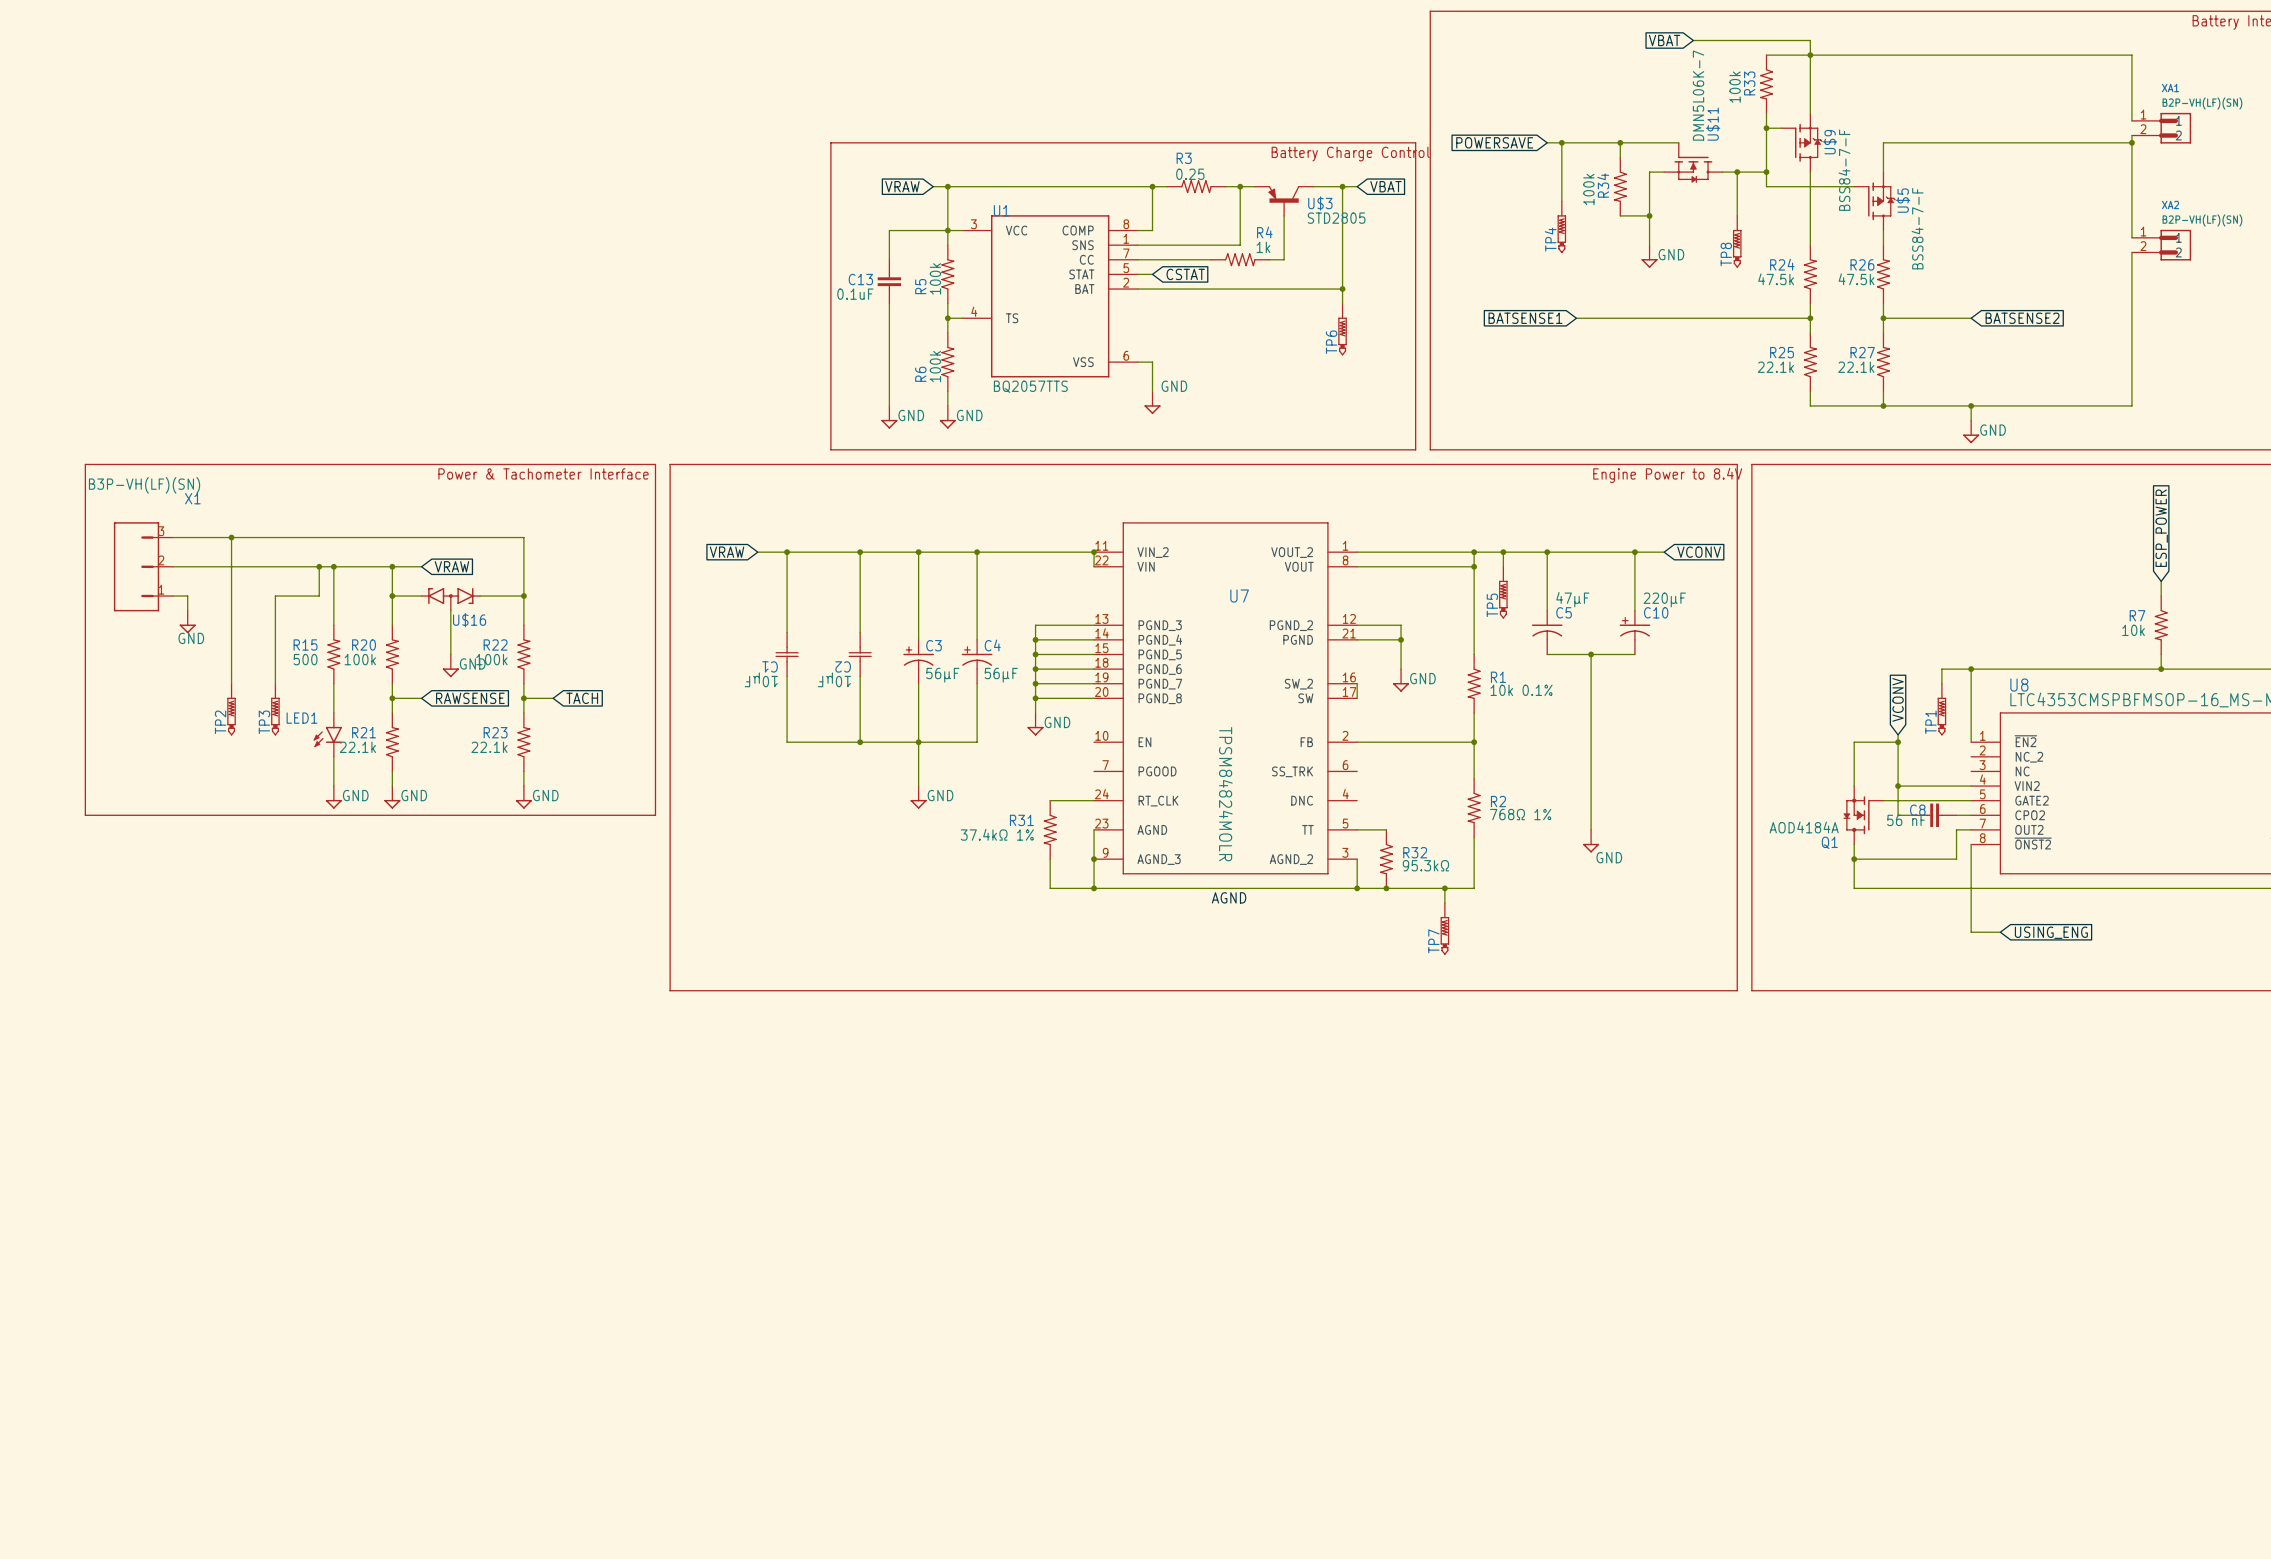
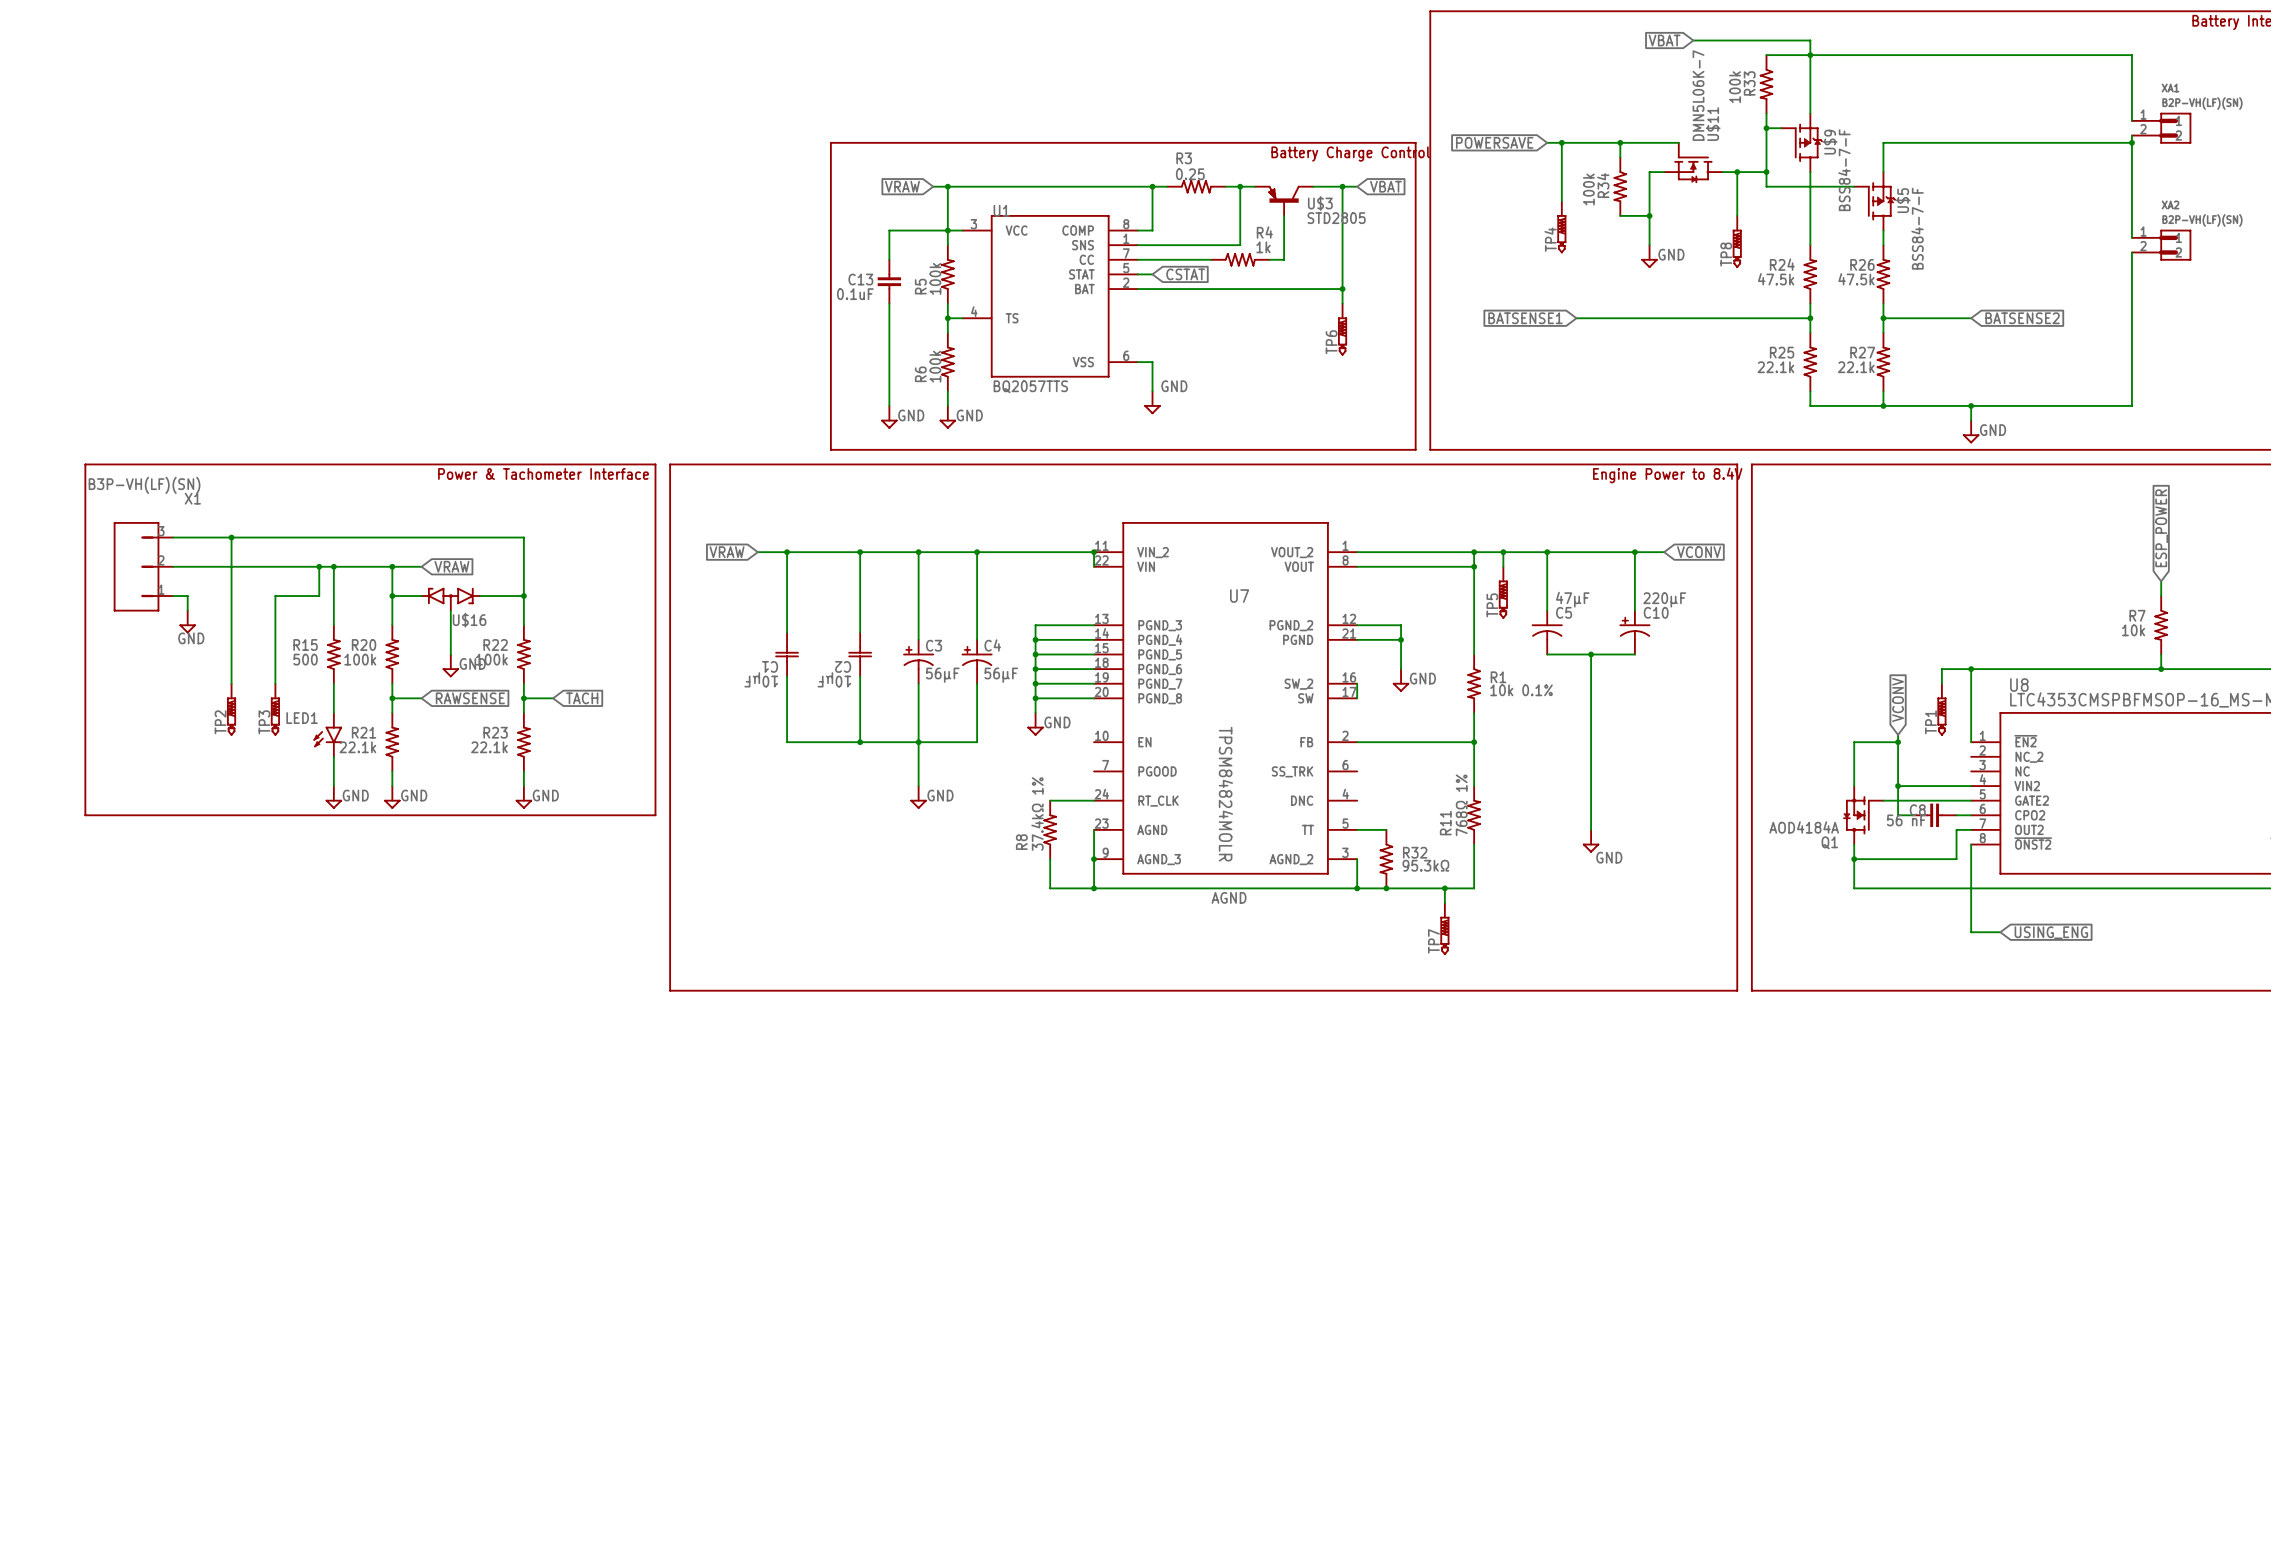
R2: 768Ω 1% (1474, 807) -> none
R11: none -> 768Ω 1% (1474, 815)
R31: 37.4kΩ 1% (1050, 829) -> none
R8: none -> 37.4kΩ 1% (1050, 829)

